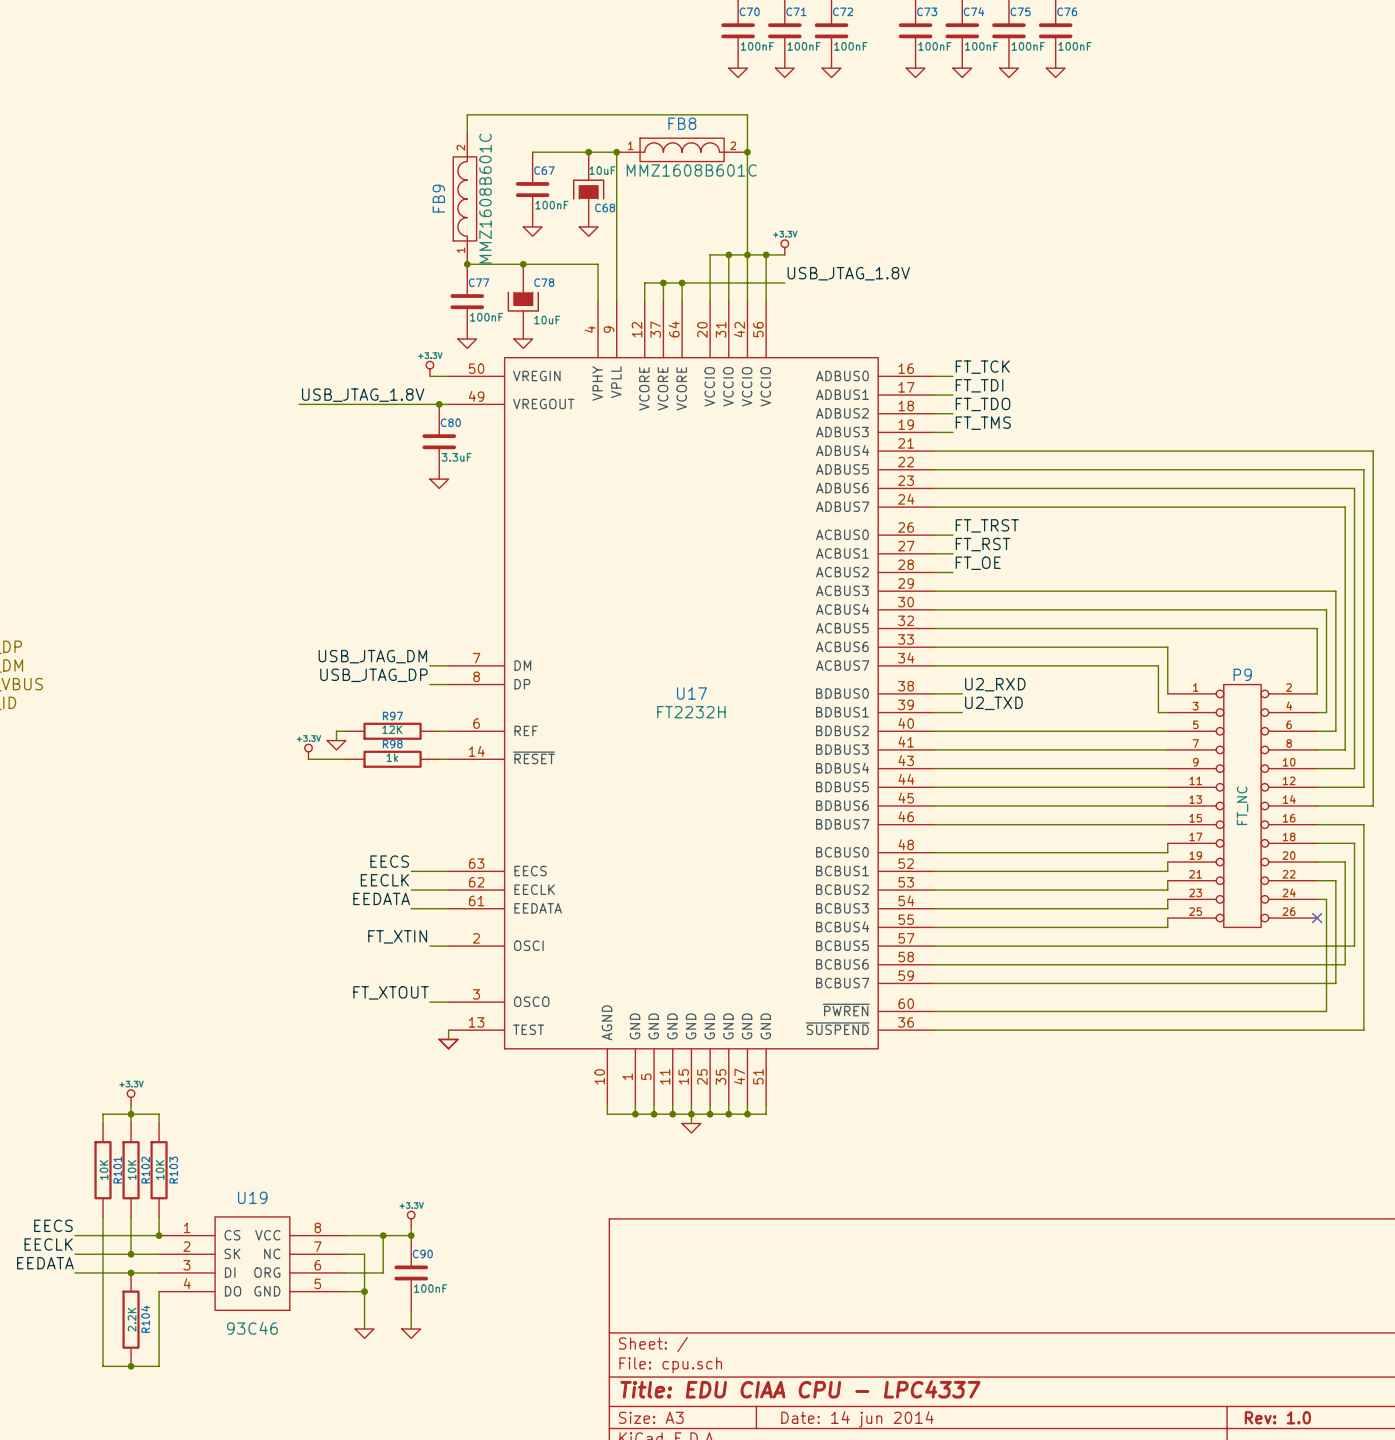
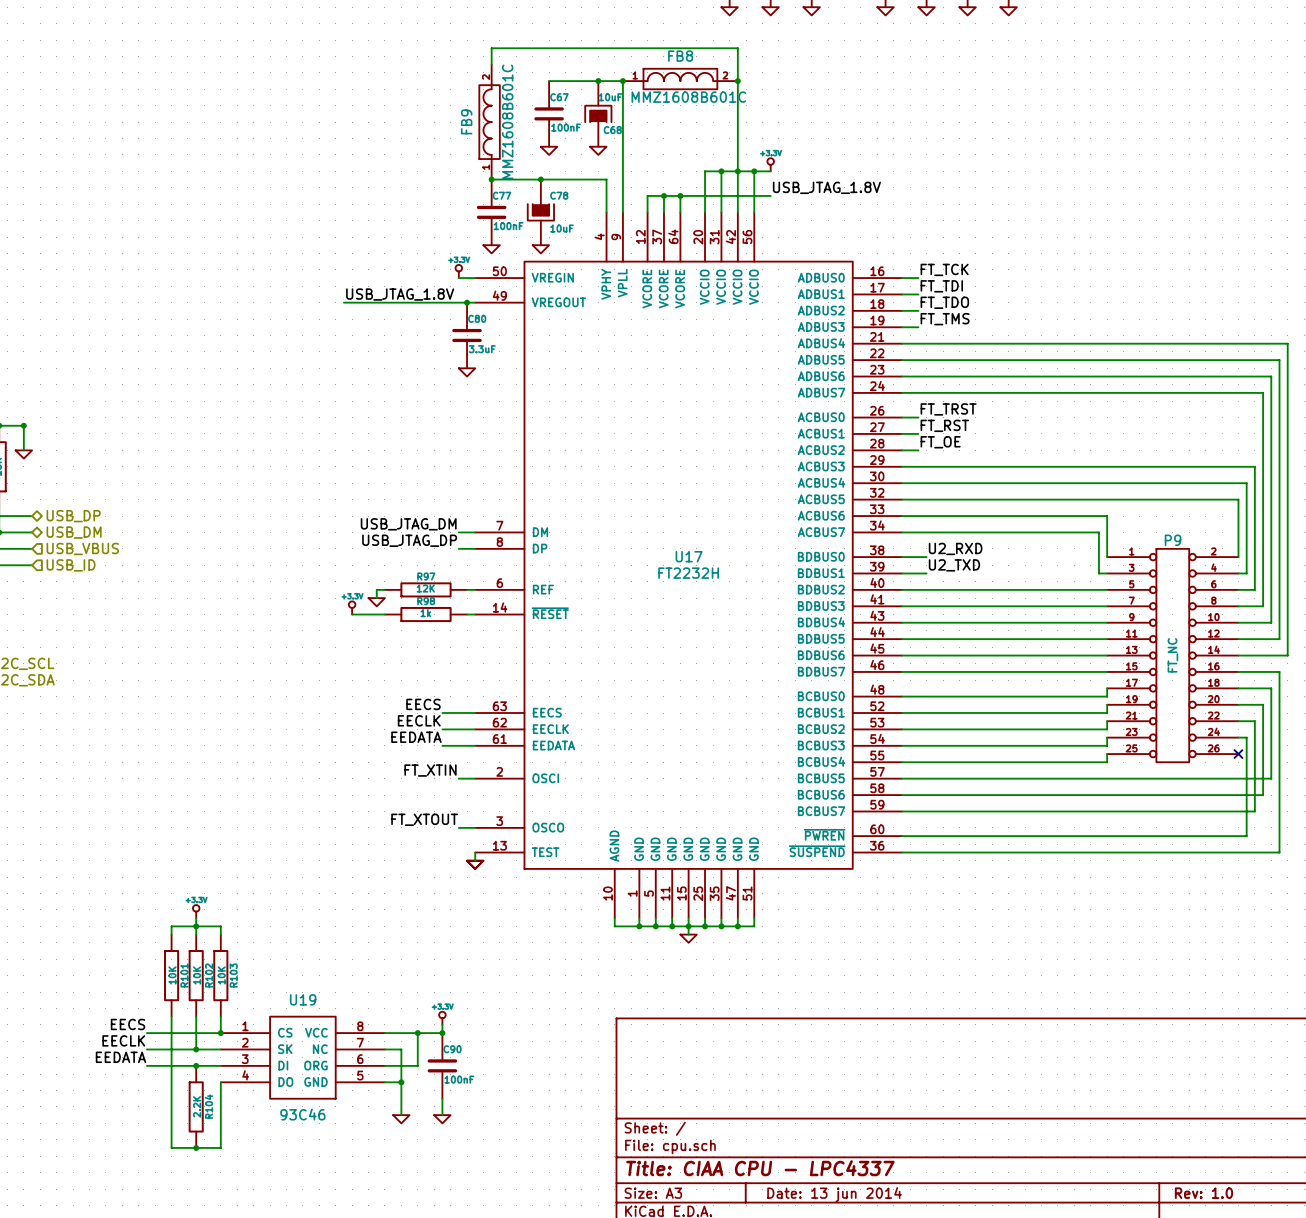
title block: Title: EDU CIAA CPU - LPC4337 (800, 1389) -> Title: CIAA CPU - LPC4337 (760, 1168)
title block: Date: 14 jun 2014 (857, 1419) -> Date: 13 jun 2014 (834, 1194)

